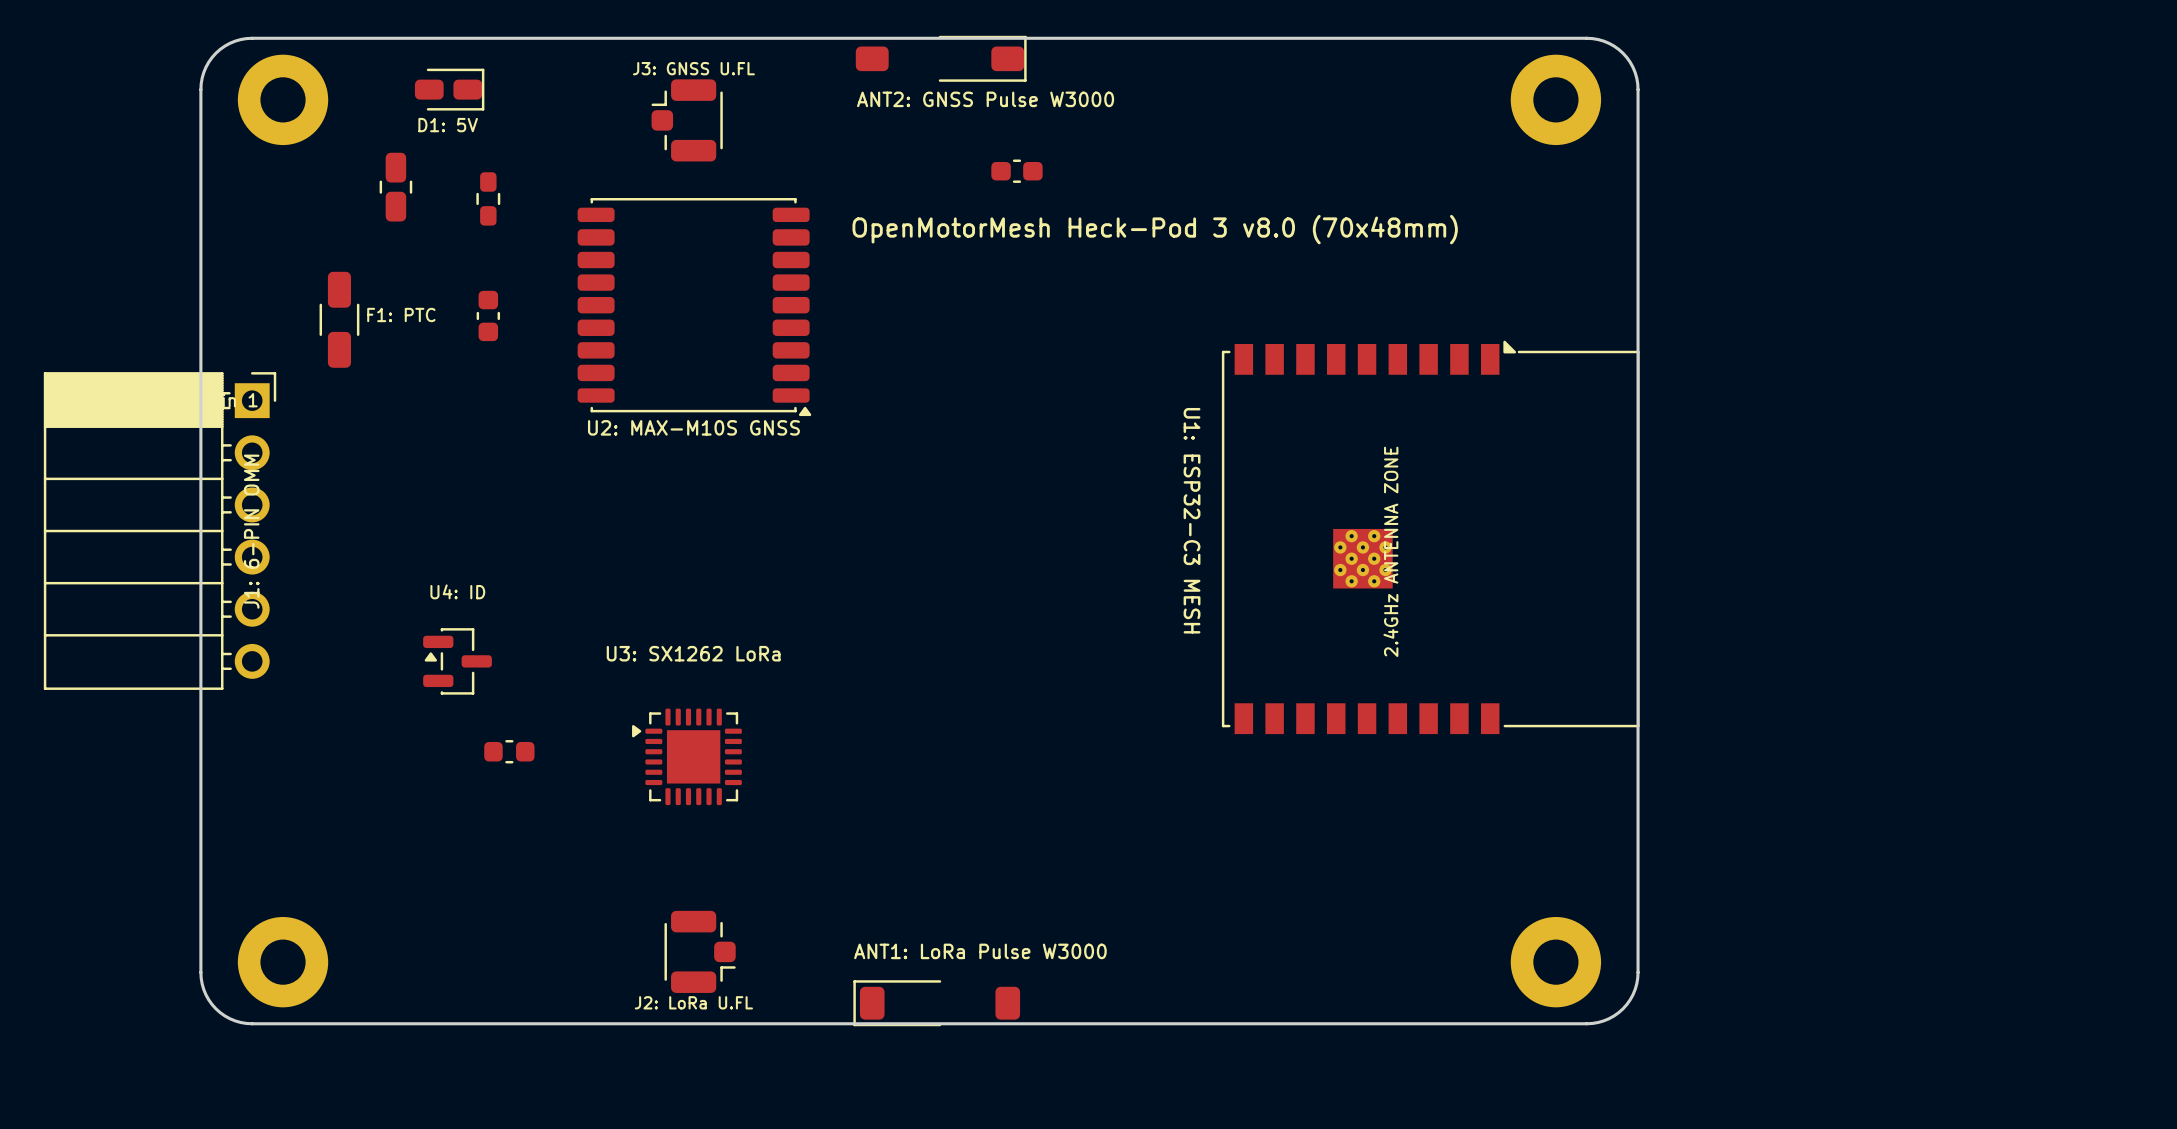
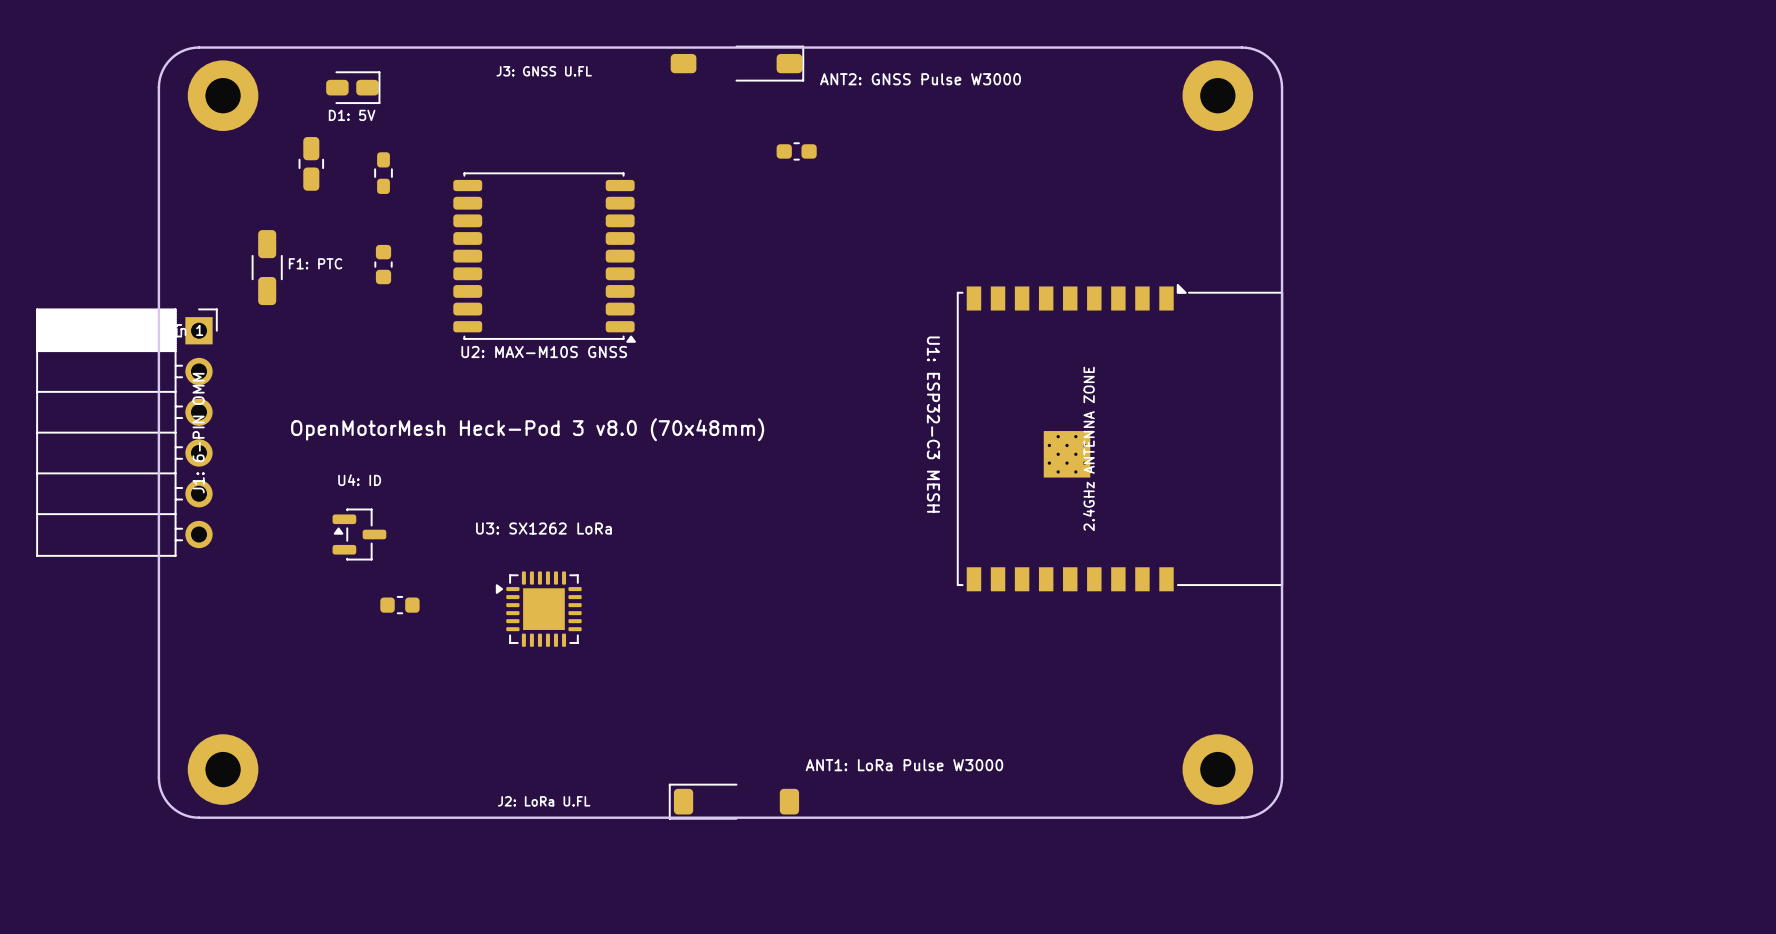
text position: ANT2: GNSS Pulse W3000 (985, 99) -> ANT2: GNSS Pulse W3000 (920, 79)
part: (687, 120) -> none
text: OpenMotorMesh Heck-Pod 3 v8.0 (70x48mm) (1155, 229) -> none
text: none -> OpenMotorMesh Heck-Pod 3 v8.0 (70x48mm) (527, 429)
part: (700, 951) -> none
text position: ANT1: LoRa Pulse W3000 (980, 951) -> ANT1: LoRa Pulse W3000 (904, 765)

